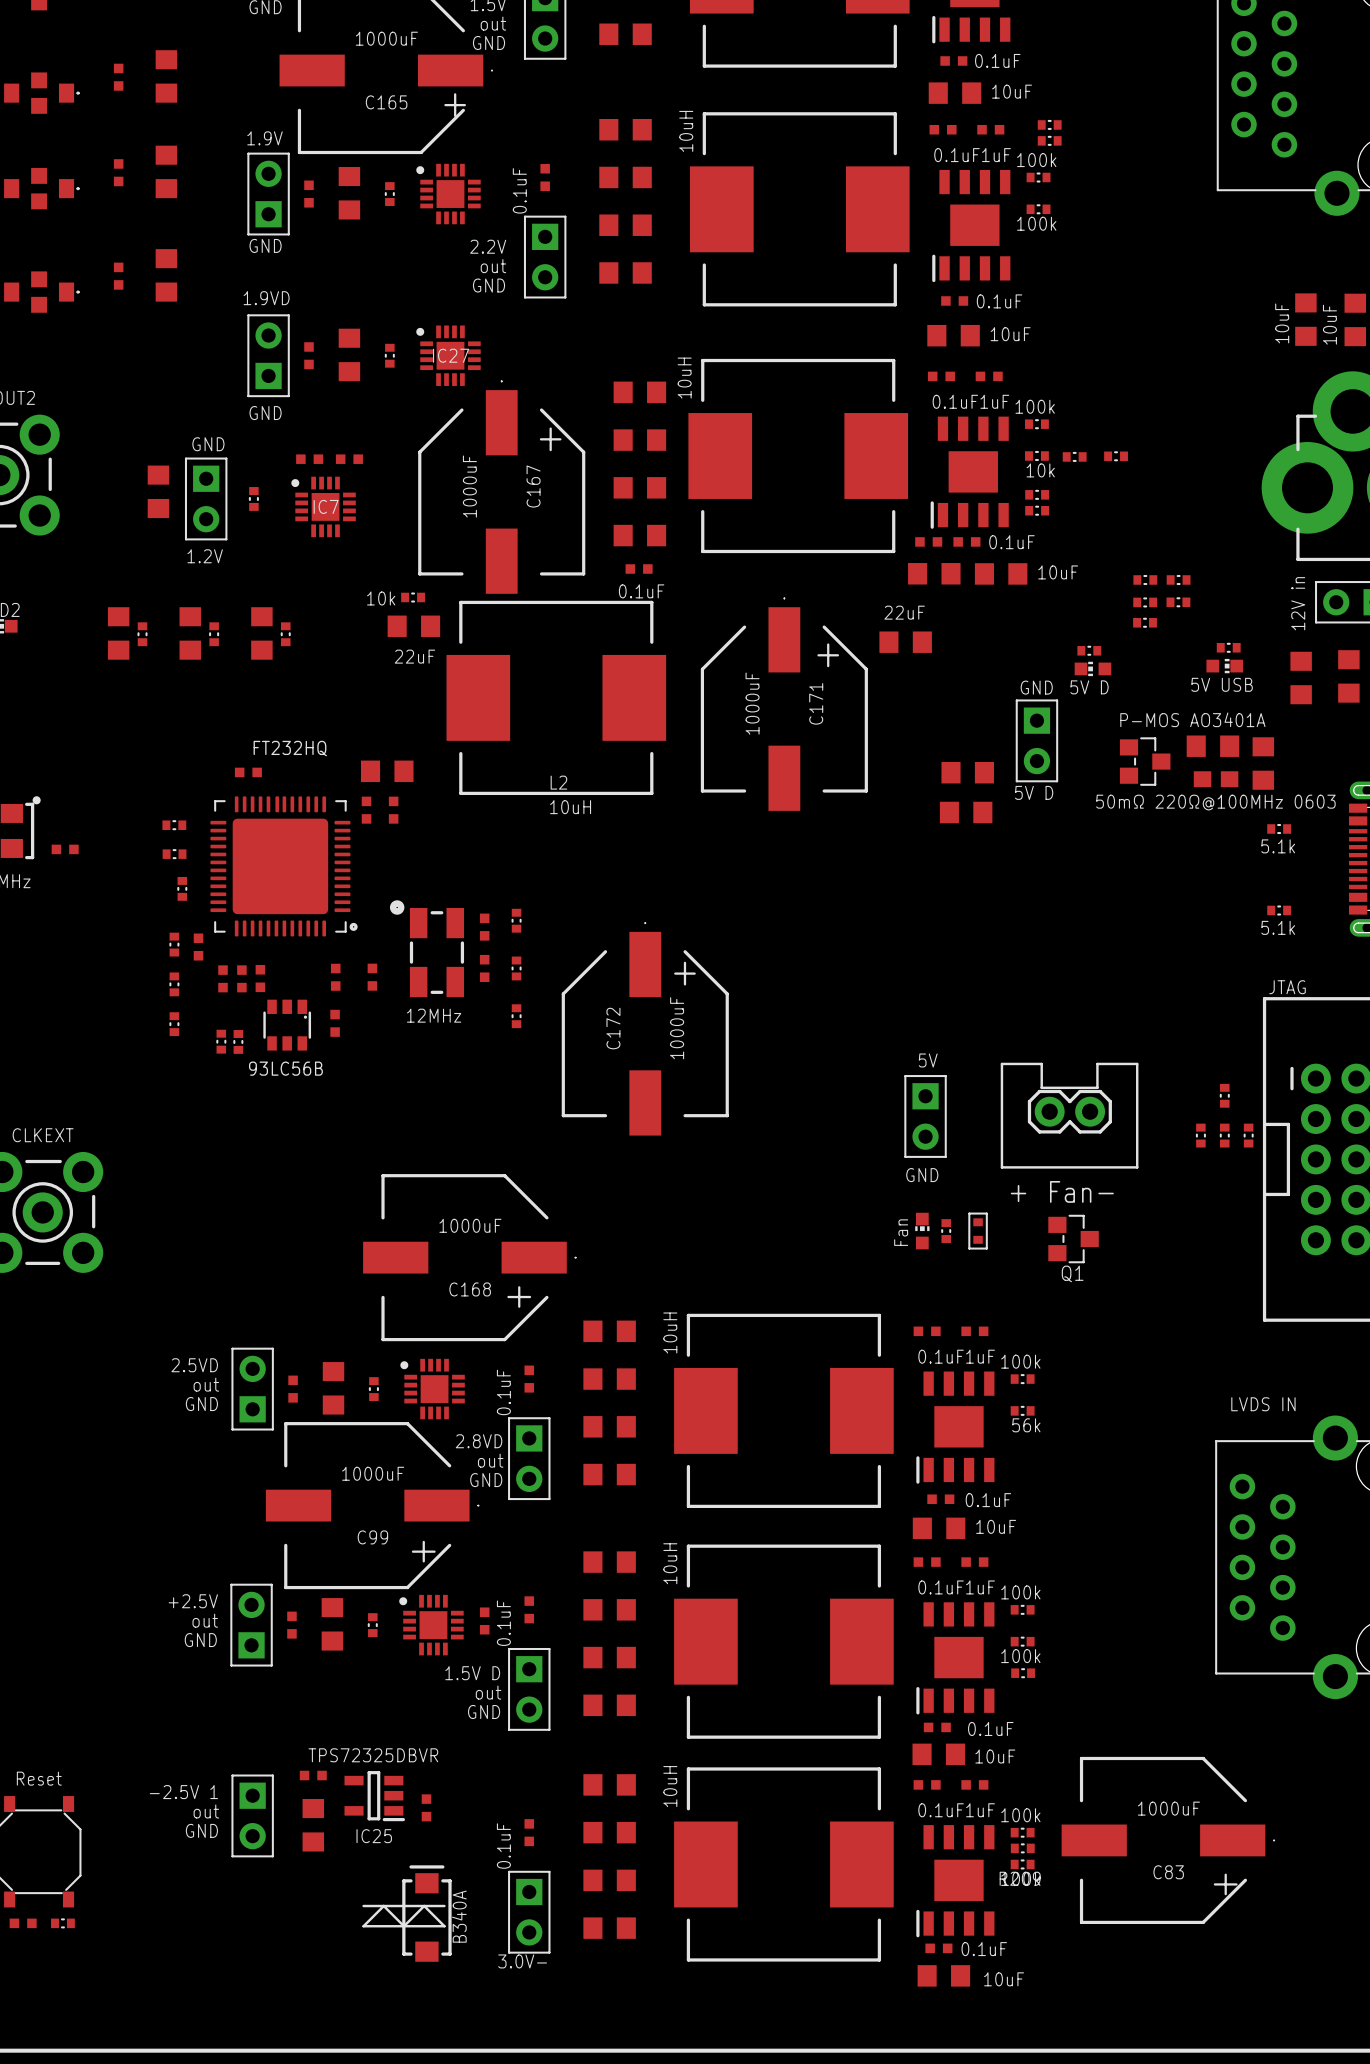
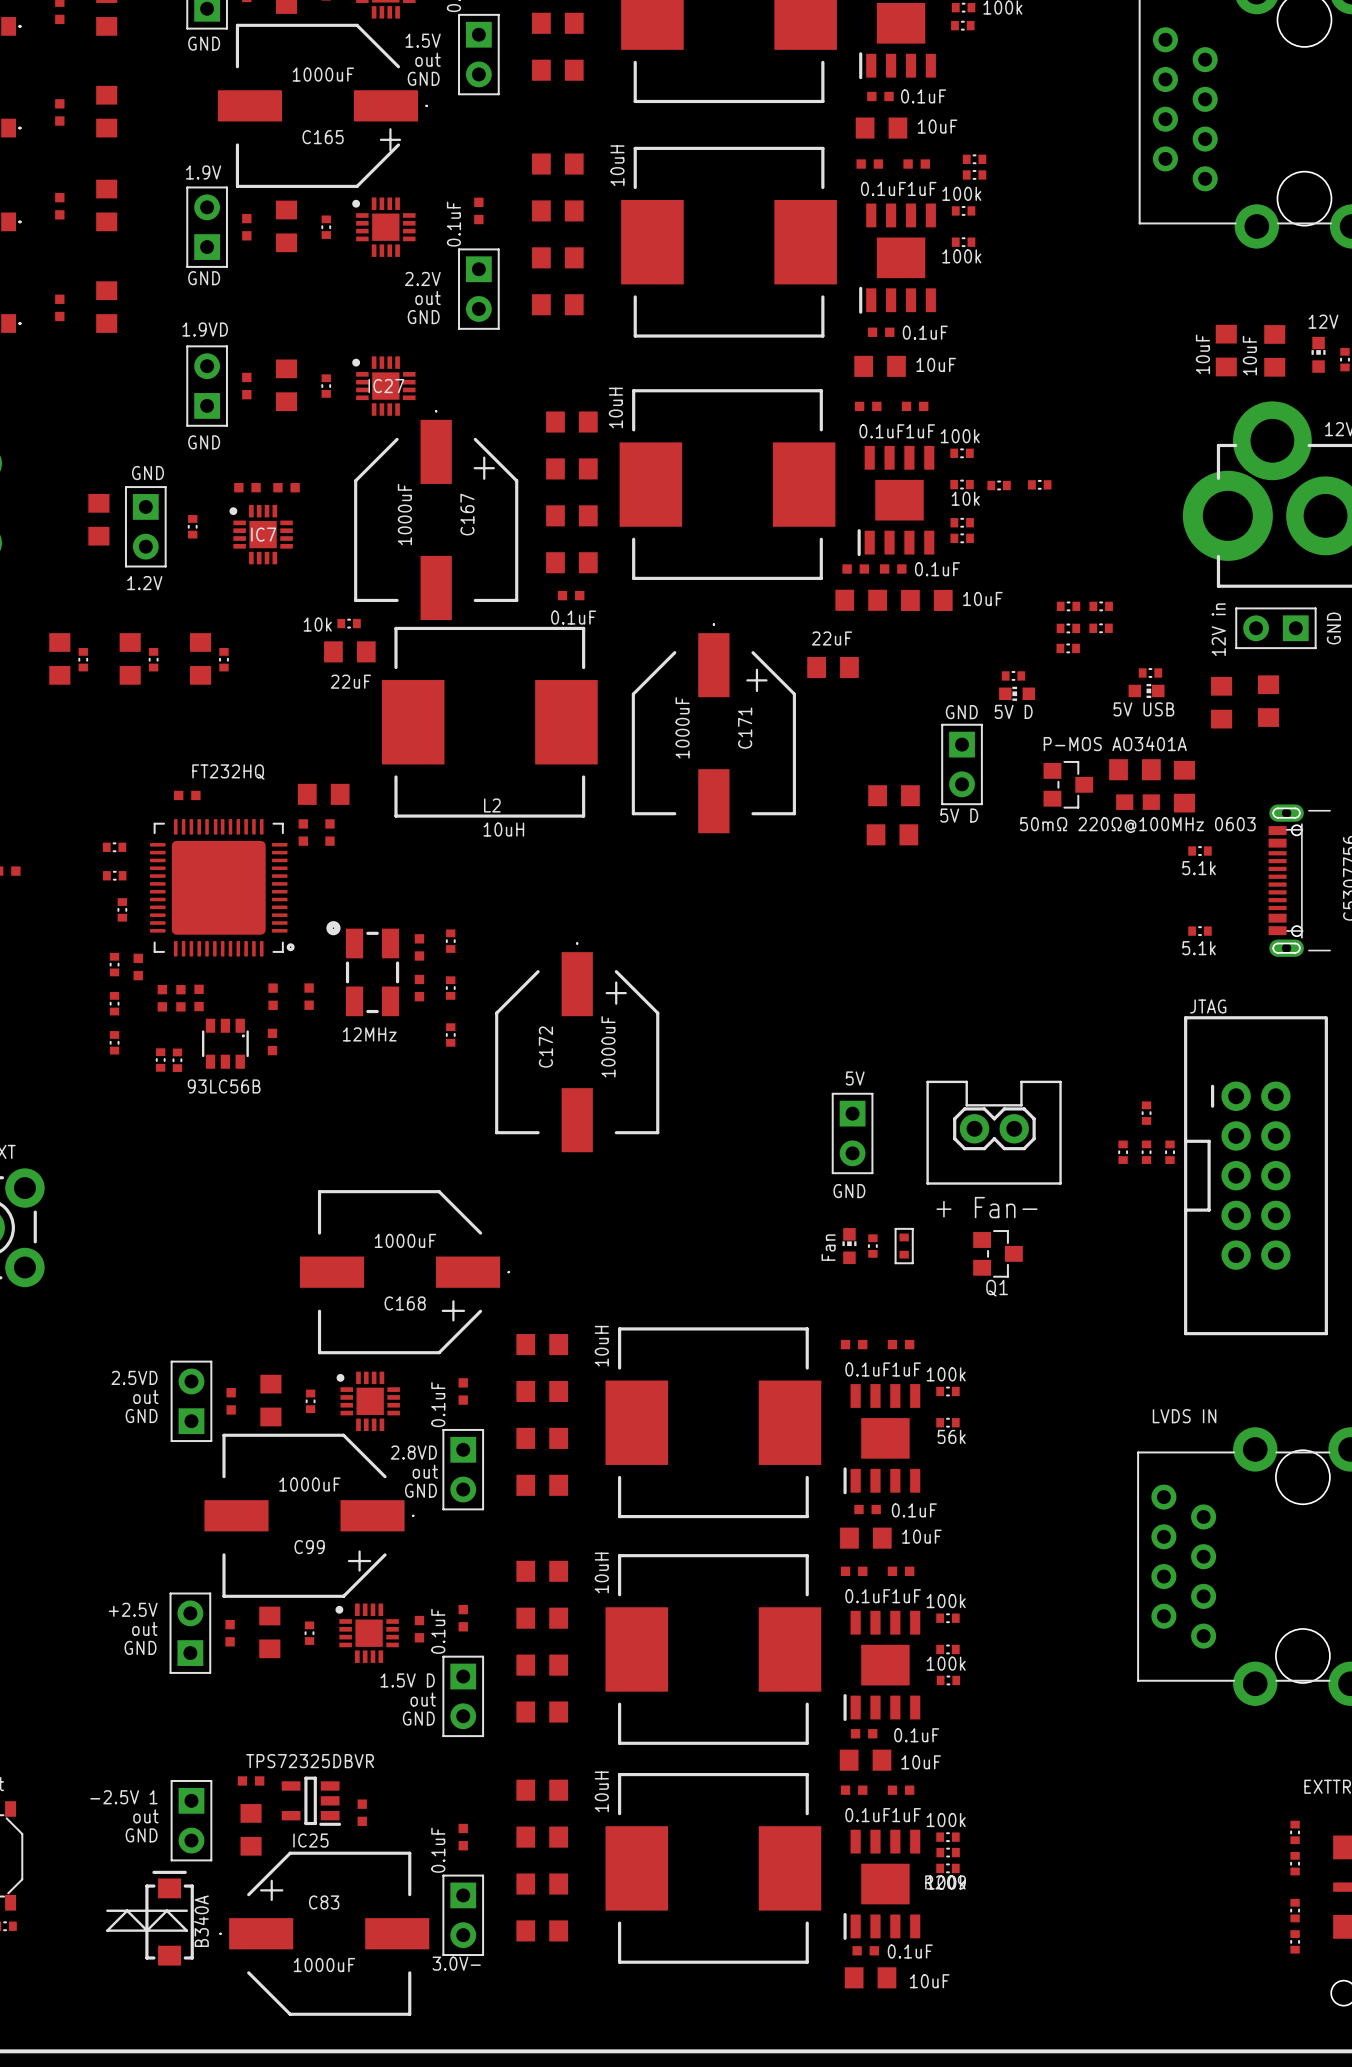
C83 rotation: 0° (1168, 1840) -> 180° (324, 1933)
C83 position: (1168, 1840) -> (324, 1933)
text: + (1225, 1884) -> none
text: none -> + (271, 1890)
line: (363, 1906) (444, 1906) -> (107, 1910) (186, 1910)
line: (383, 1906) (363, 1926) (444, 1926) (424, 1906) (404, 1926) (383, 1906) -> (127, 1910) (107, 1930) (186, 1930) (166, 1910) (147, 1930) (127, 1910)
part position: (426, 1913) -> (169, 1918)

